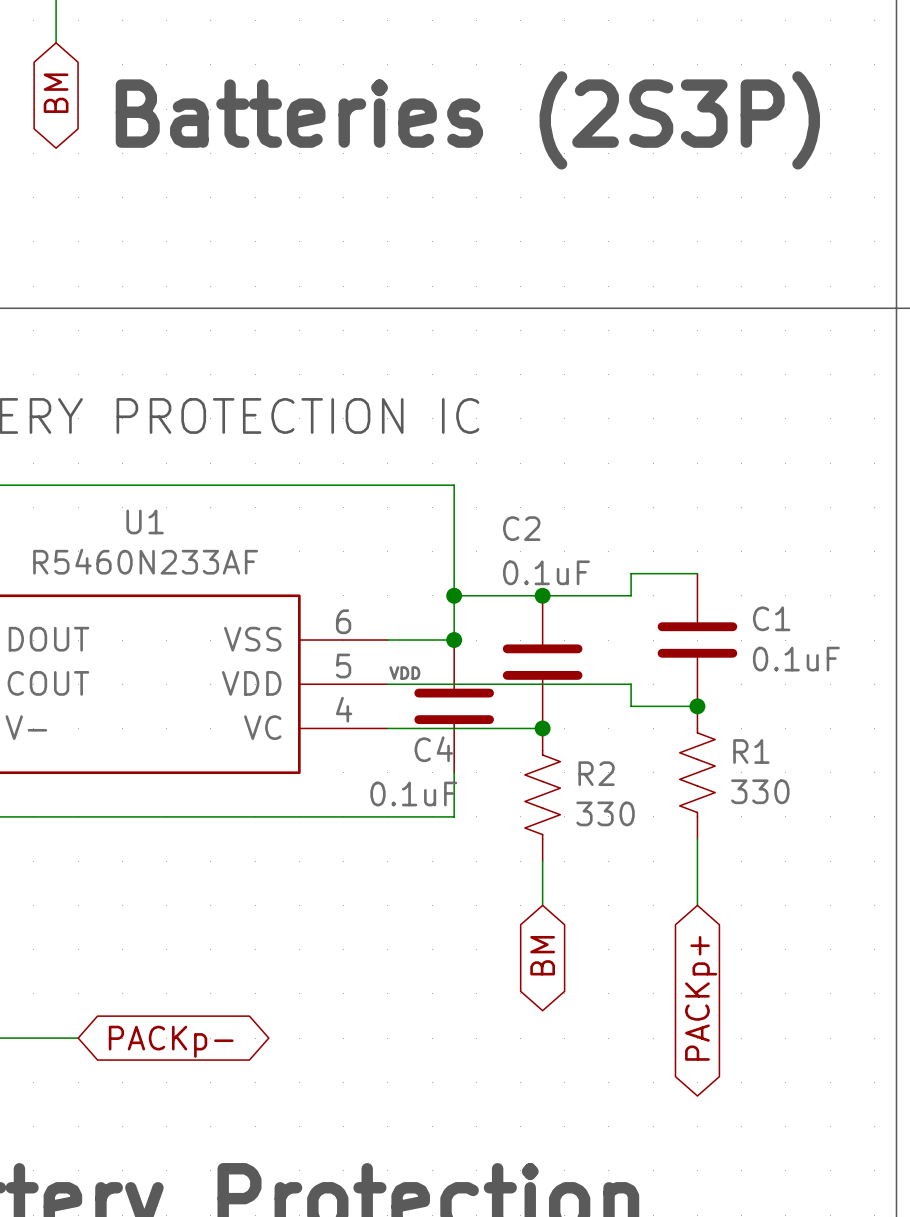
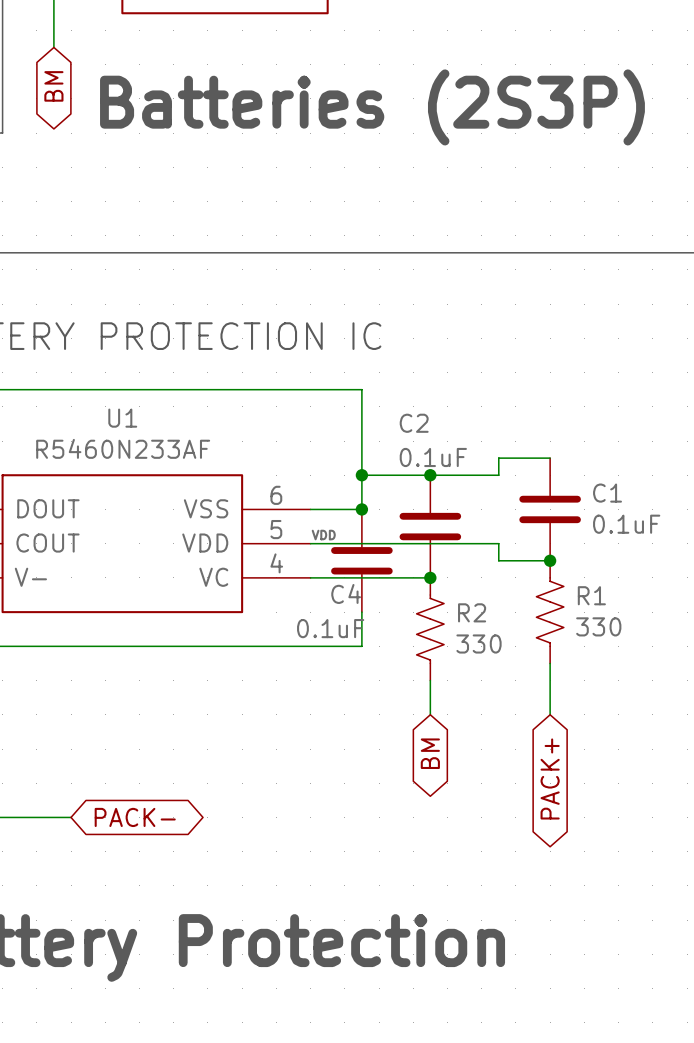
global label: PACKp+ (701, 998) -> PACK+ (550, 778)
global label: PACKp- (171, 1041) -> PACK- (135, 817)

